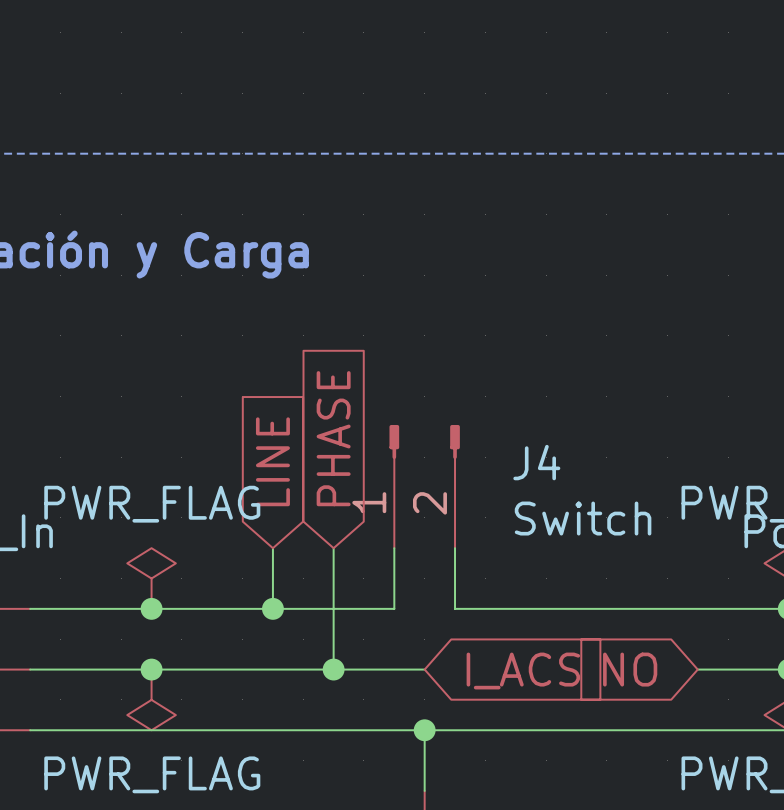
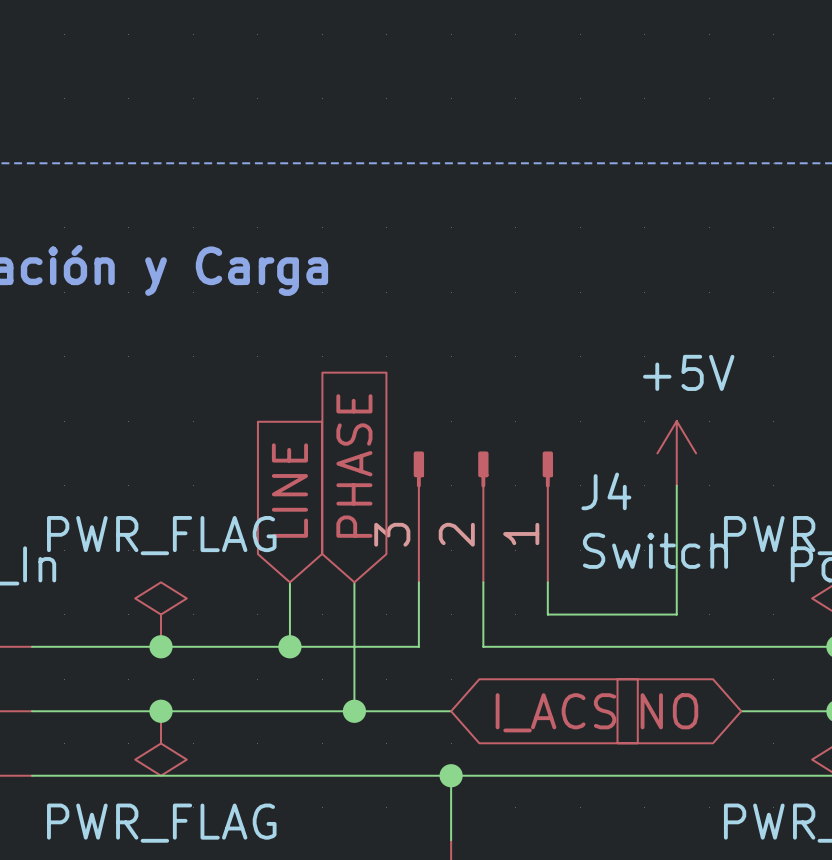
J4 symbol: [389, 424, 460, 549] -> [413, 451, 553, 583]
power symbol: none -> +5V (676, 453)
wire: none -> (676, 485) (676, 614) (547, 614) (547, 582)

